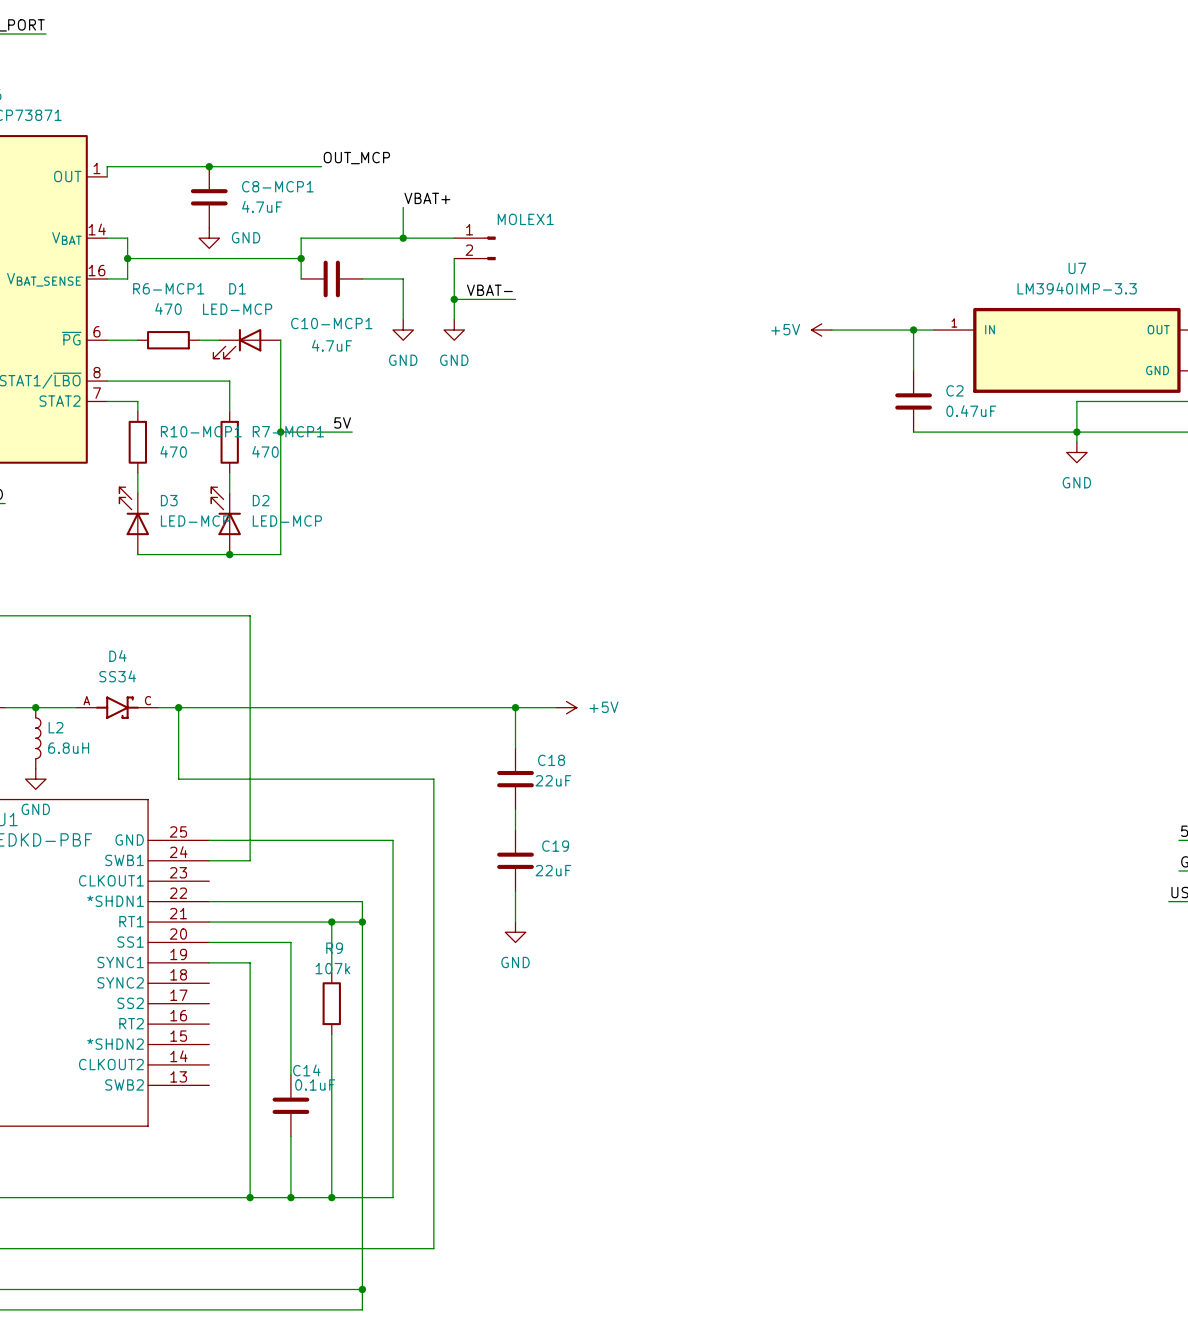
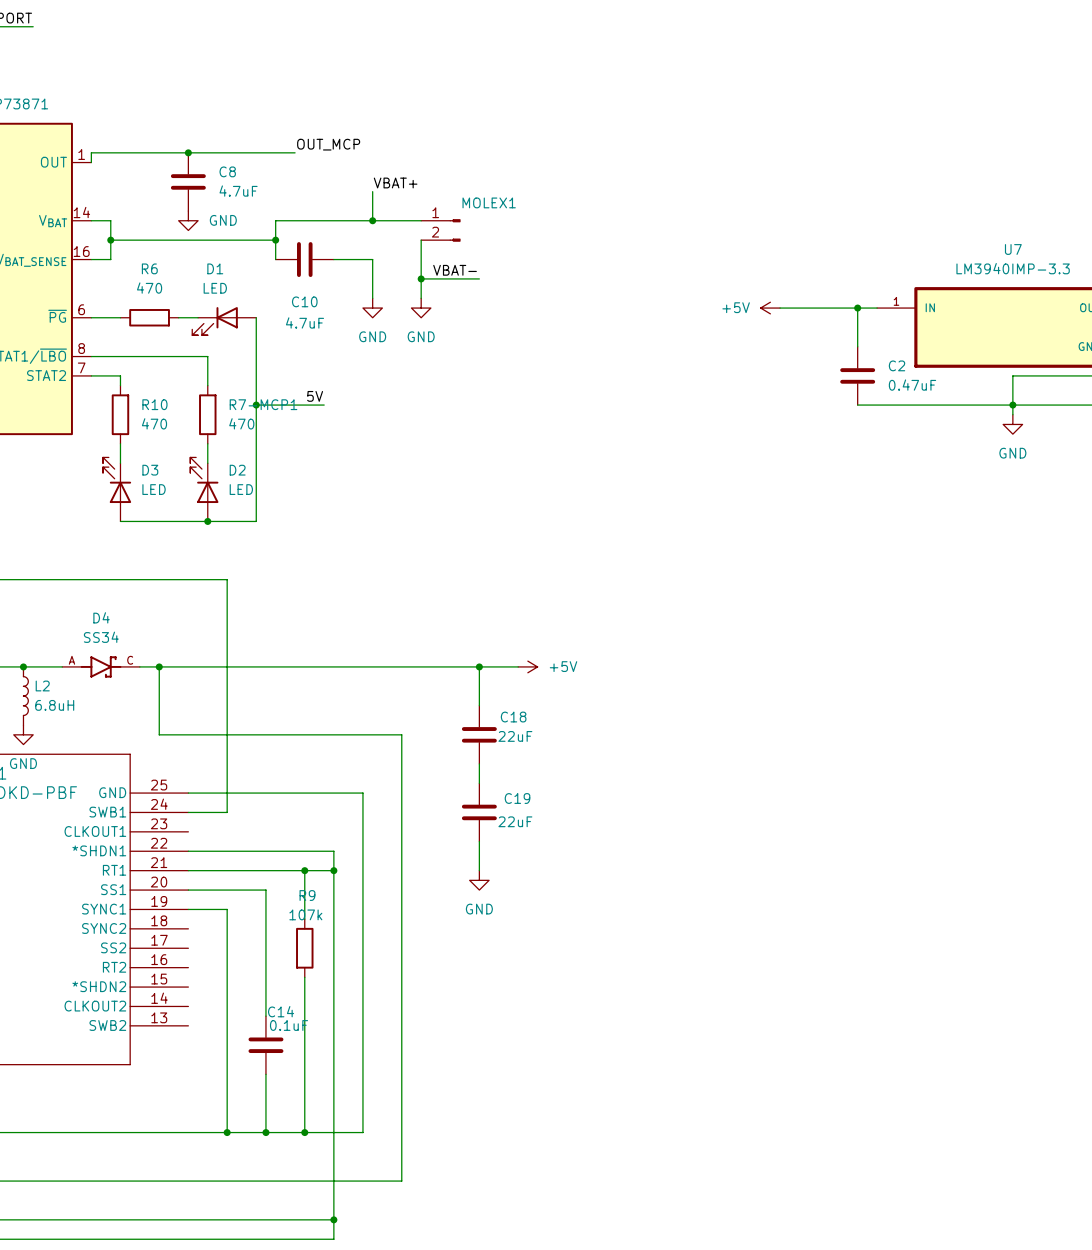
C8-MCP1 name: C8-MCP1 (277, 186) -> C8 (227, 171)
R6-MCP1 name: R6-MCP1 (168, 288) -> R6 (149, 268)
D1 value: LED-MCP (237, 309) -> LED (215, 288)
C10-MCP1 name: C10-MCP1 (331, 323) -> C10 (304, 301)
R10-MCP1 name: R10-MCP1 (201, 431) -> R10 (154, 404)
D3 value: LED-MCP (195, 521) -> LED (154, 489)
D2 value: LED-MCP (287, 521) -> LED (241, 489)

